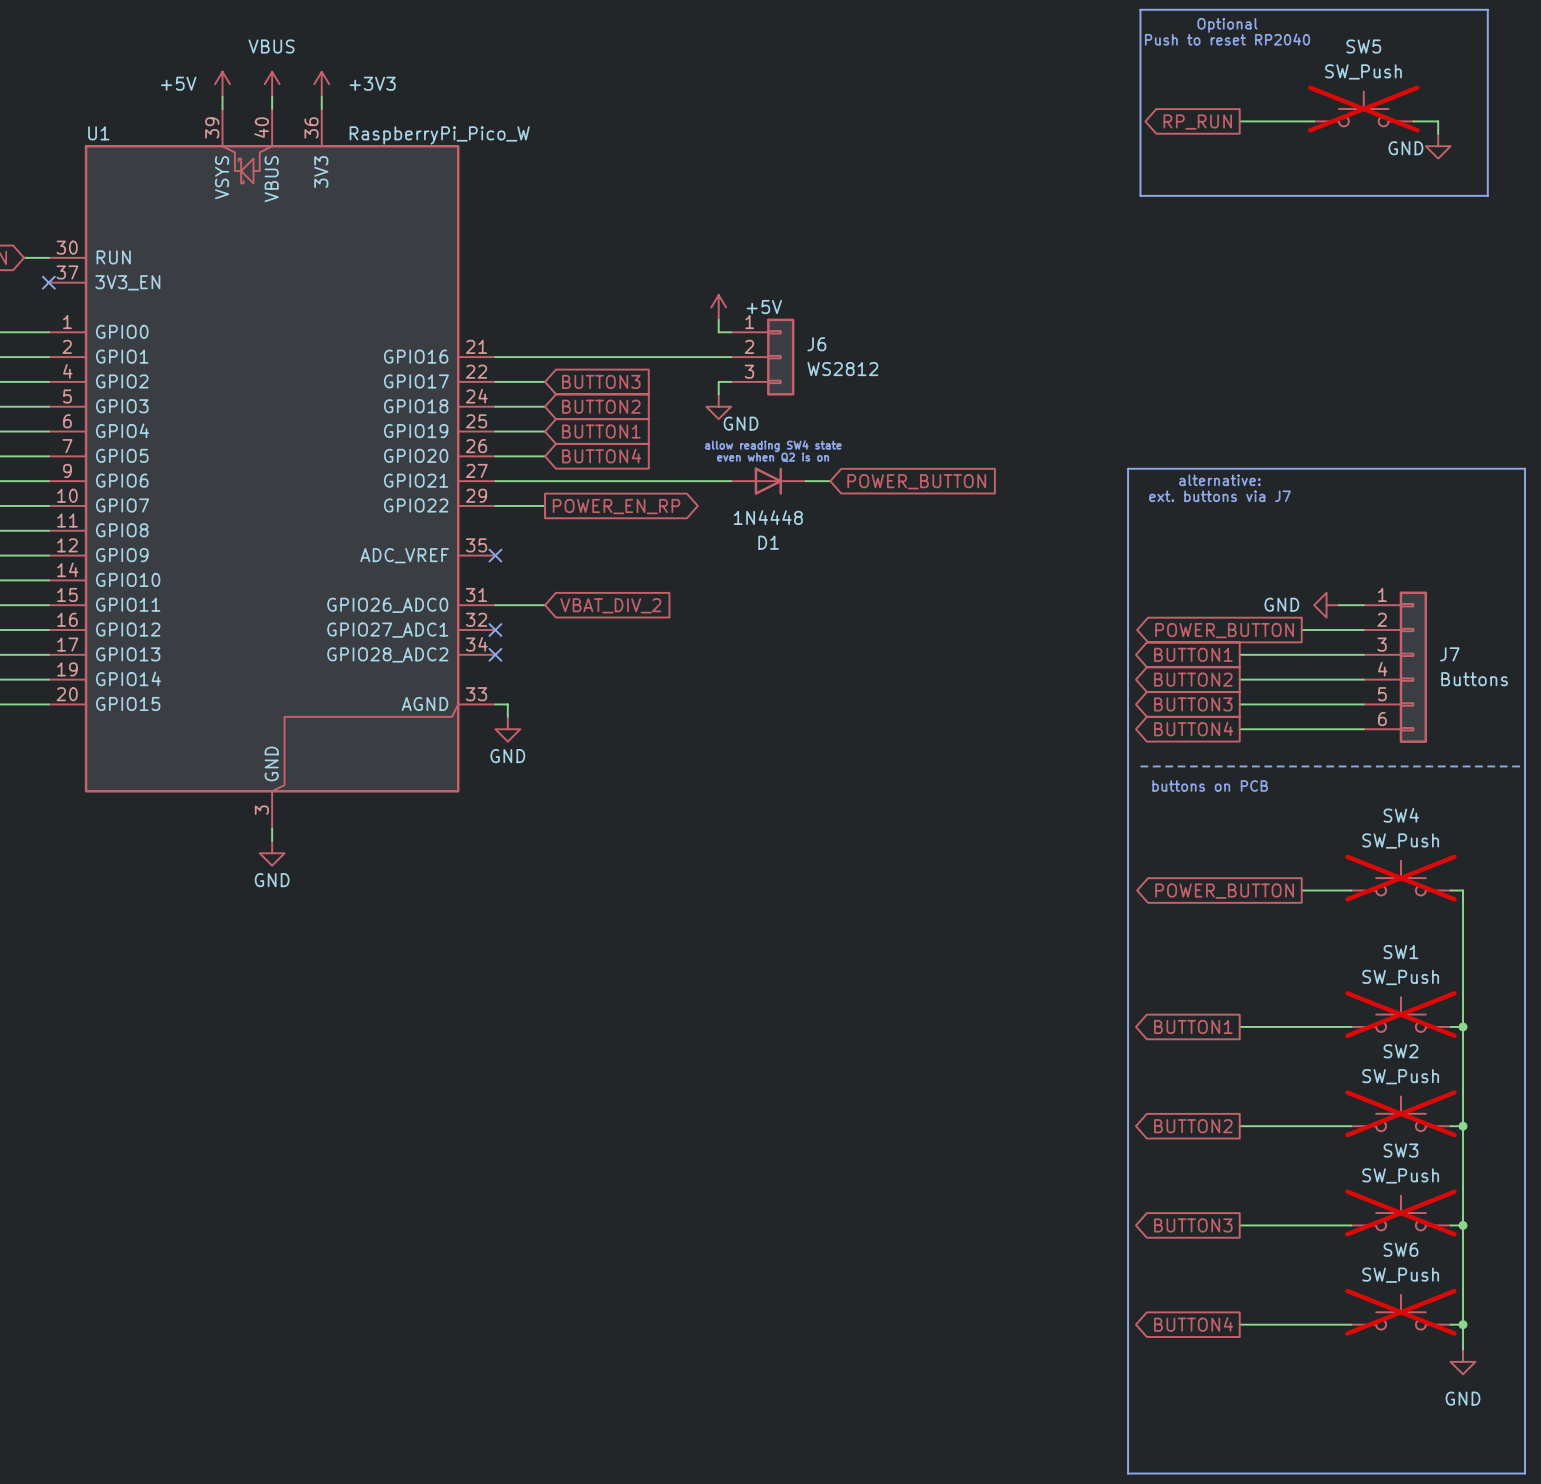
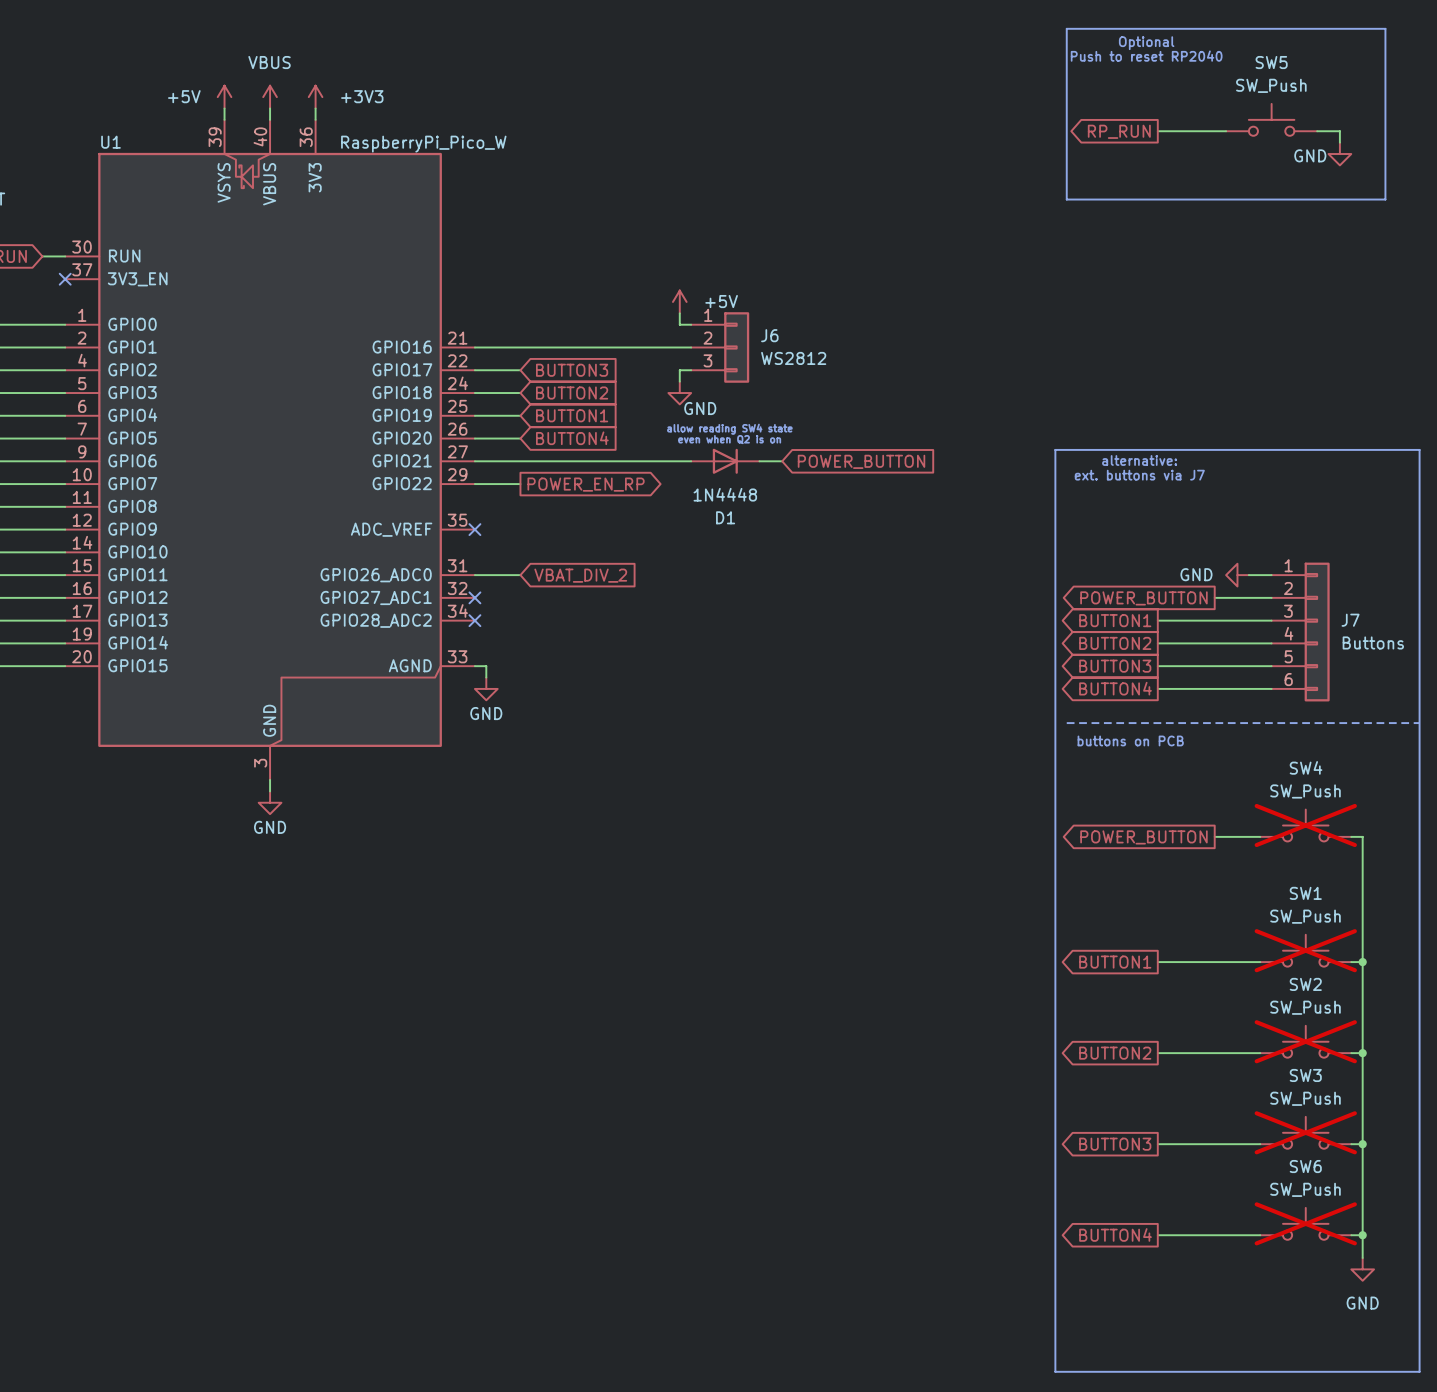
SW5 do-not-place cross: (1363, 109) -> none

